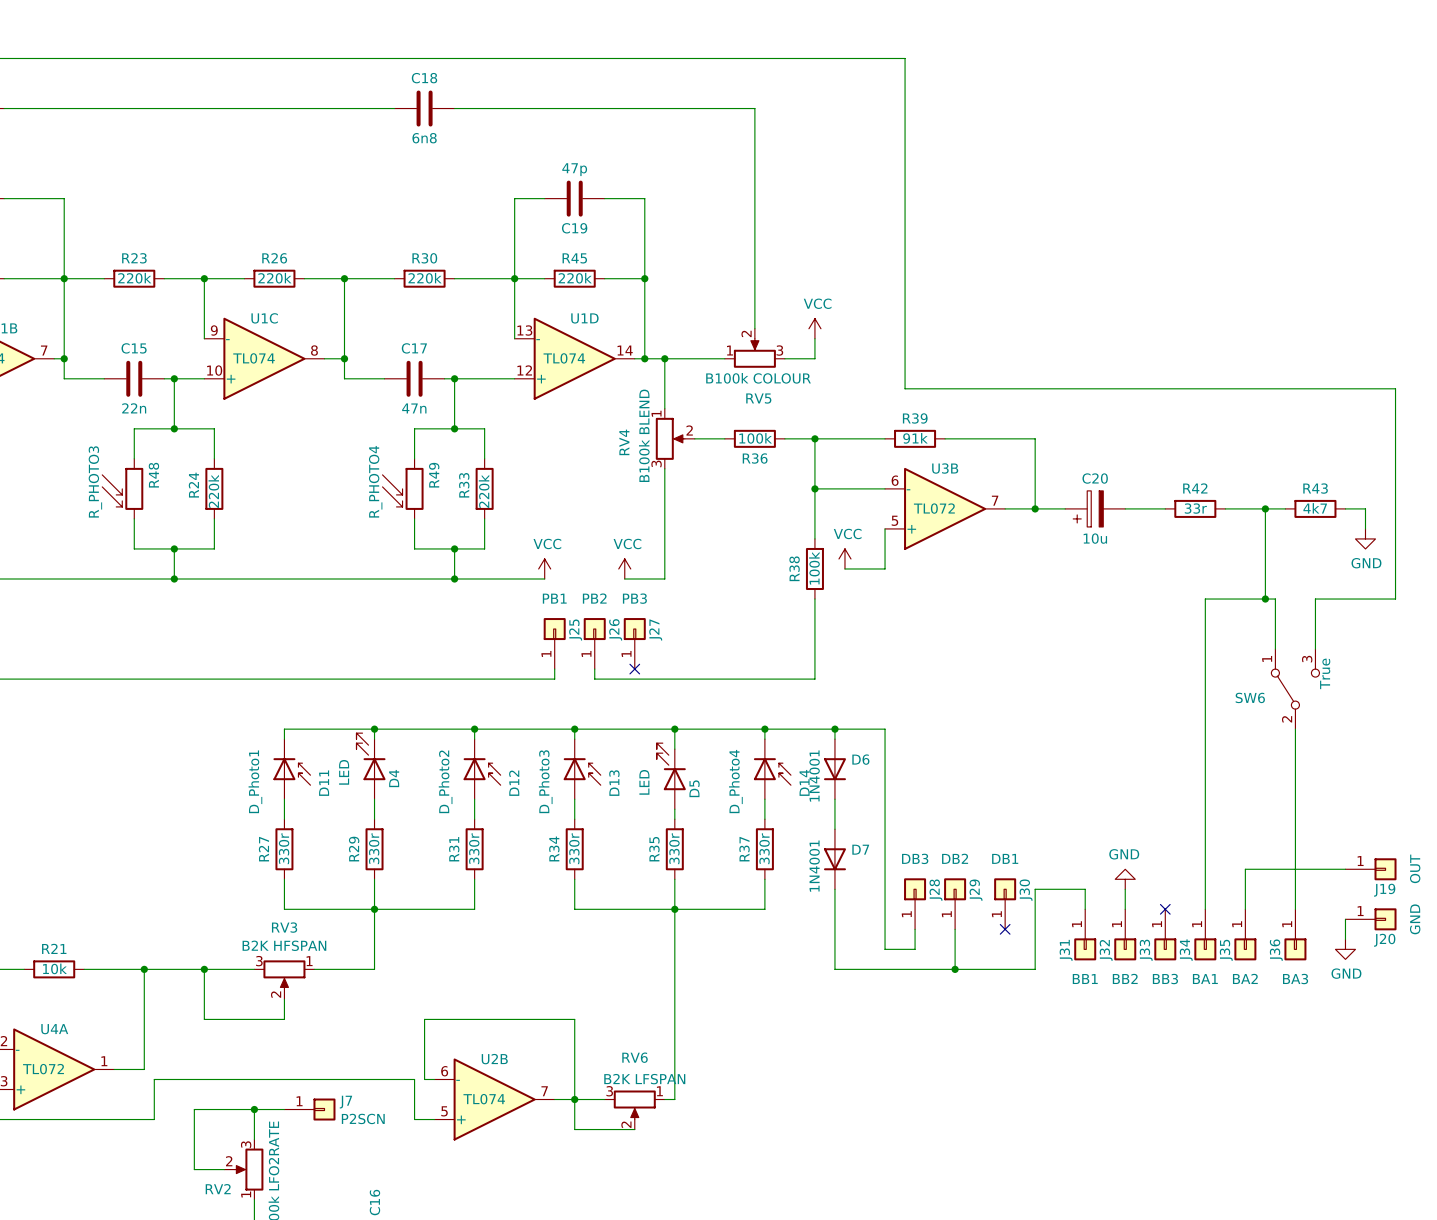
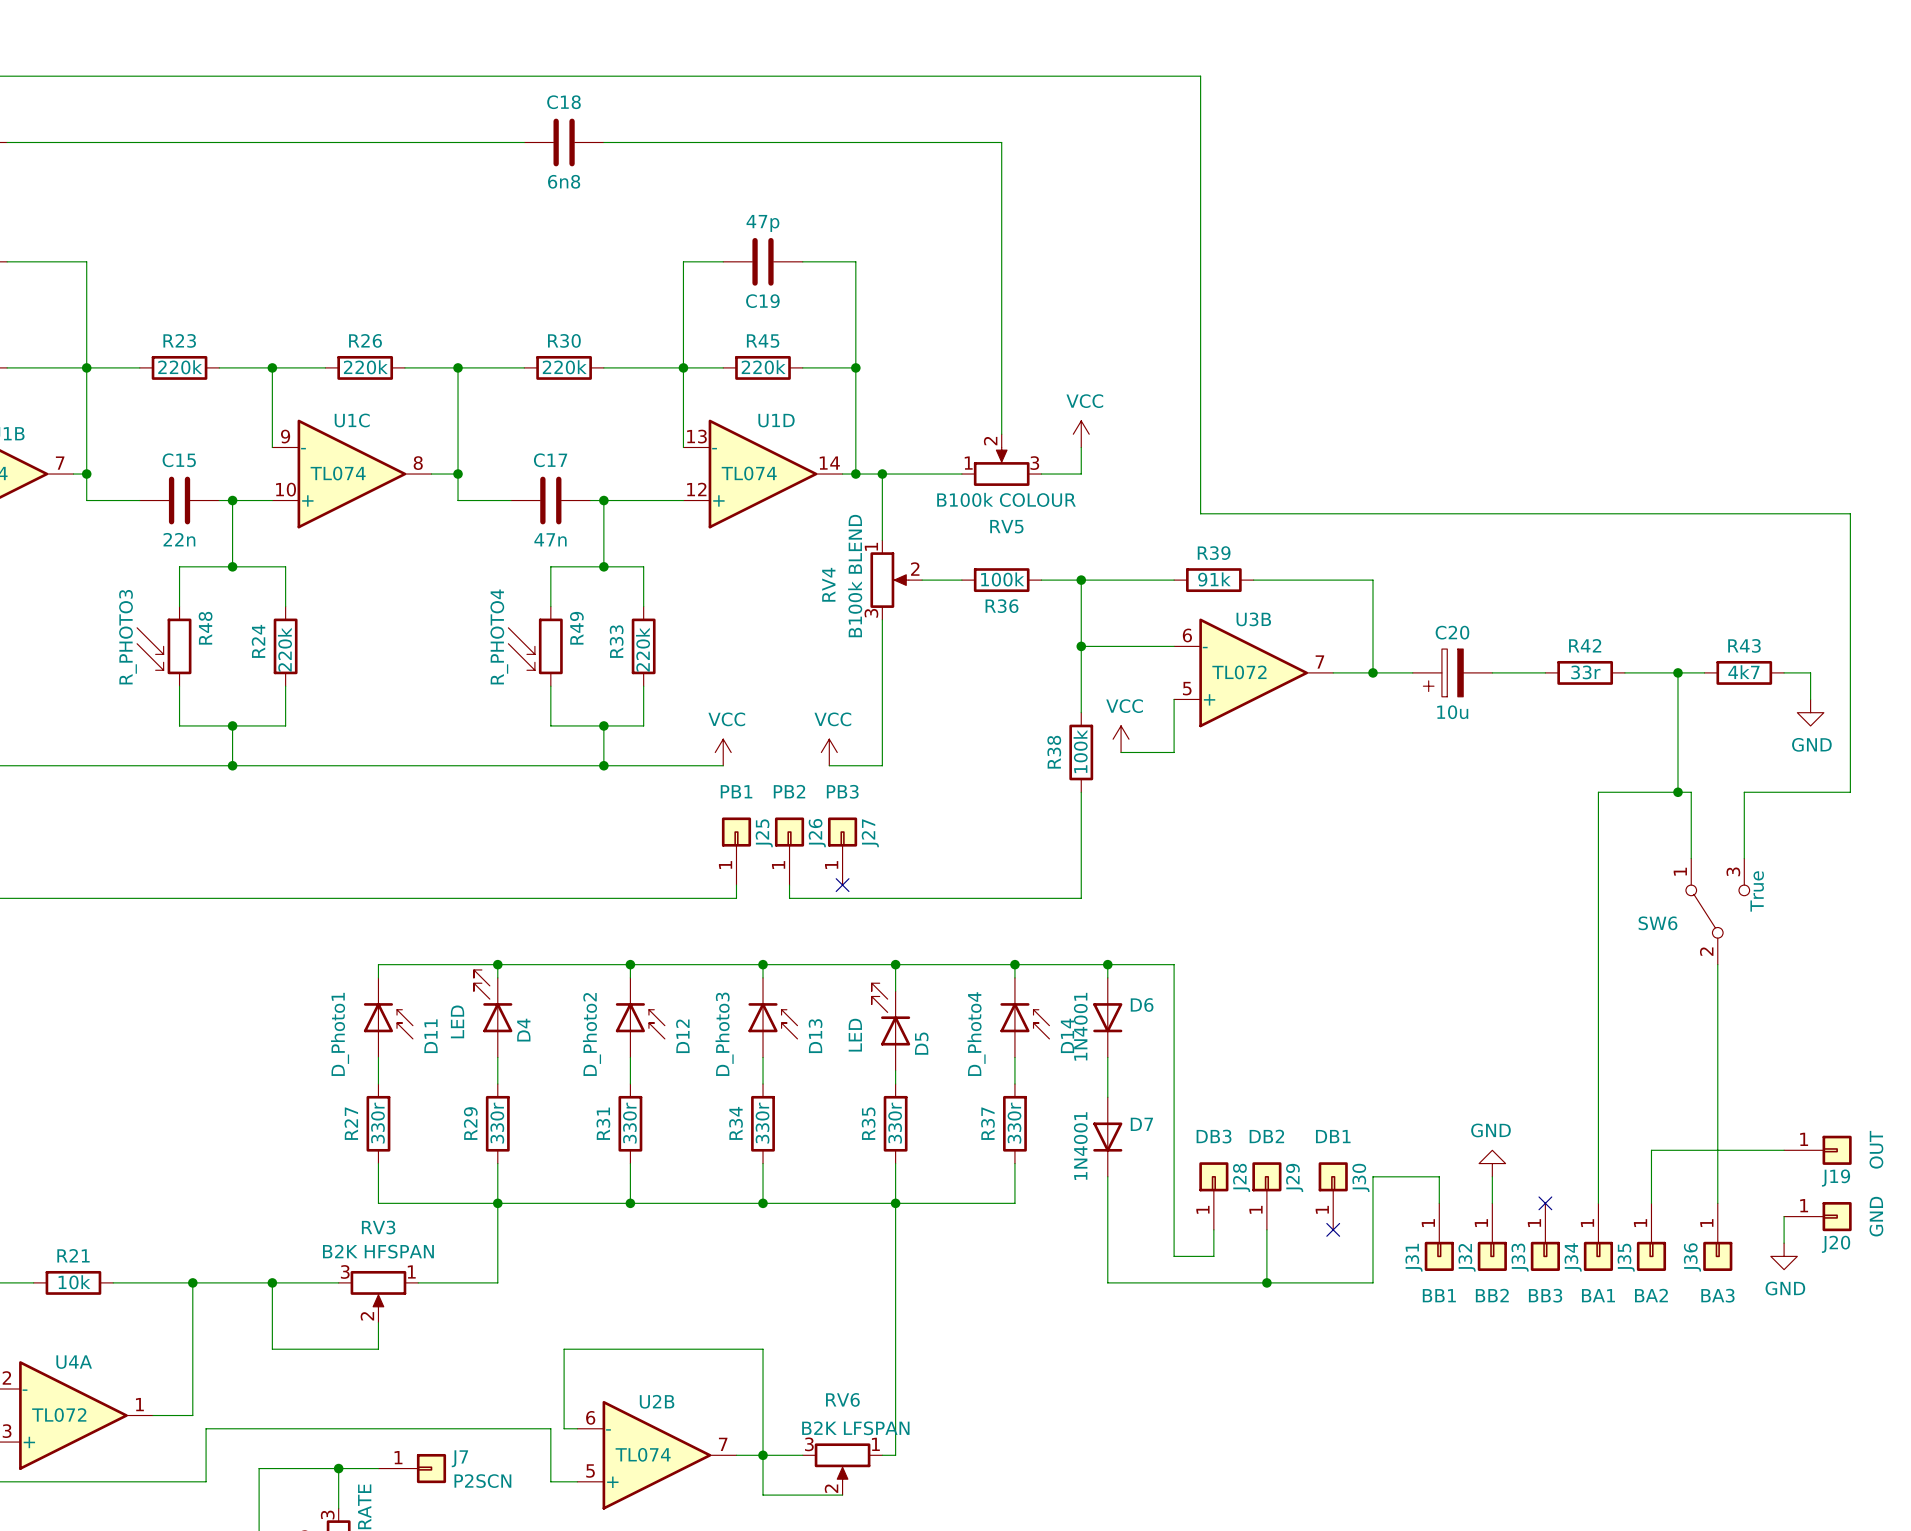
wire: none -> (630, 1203) (763, 1203)
junction: none -> (630, 1203)
junction: none -> (763, 1203)

